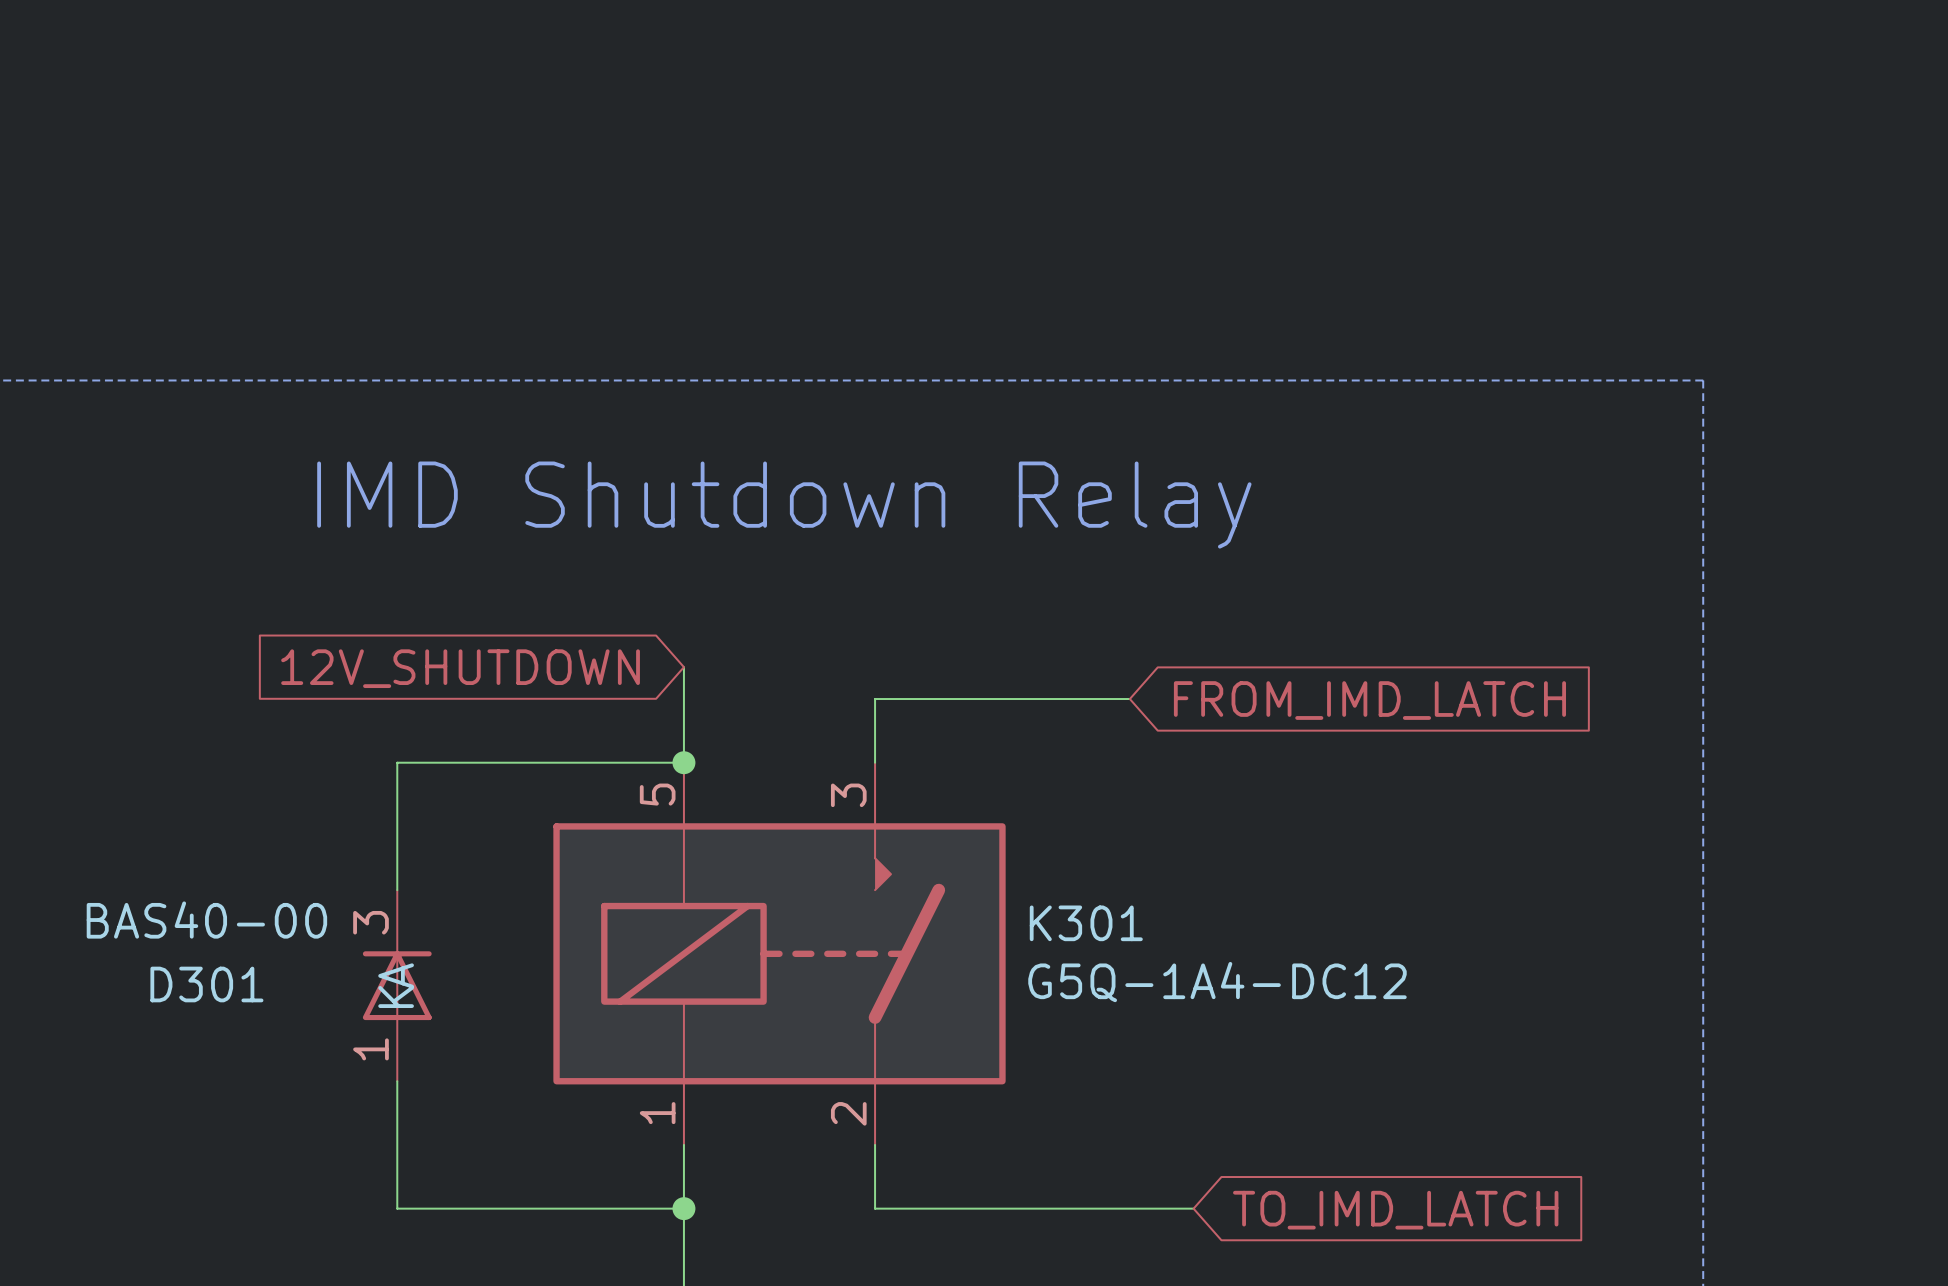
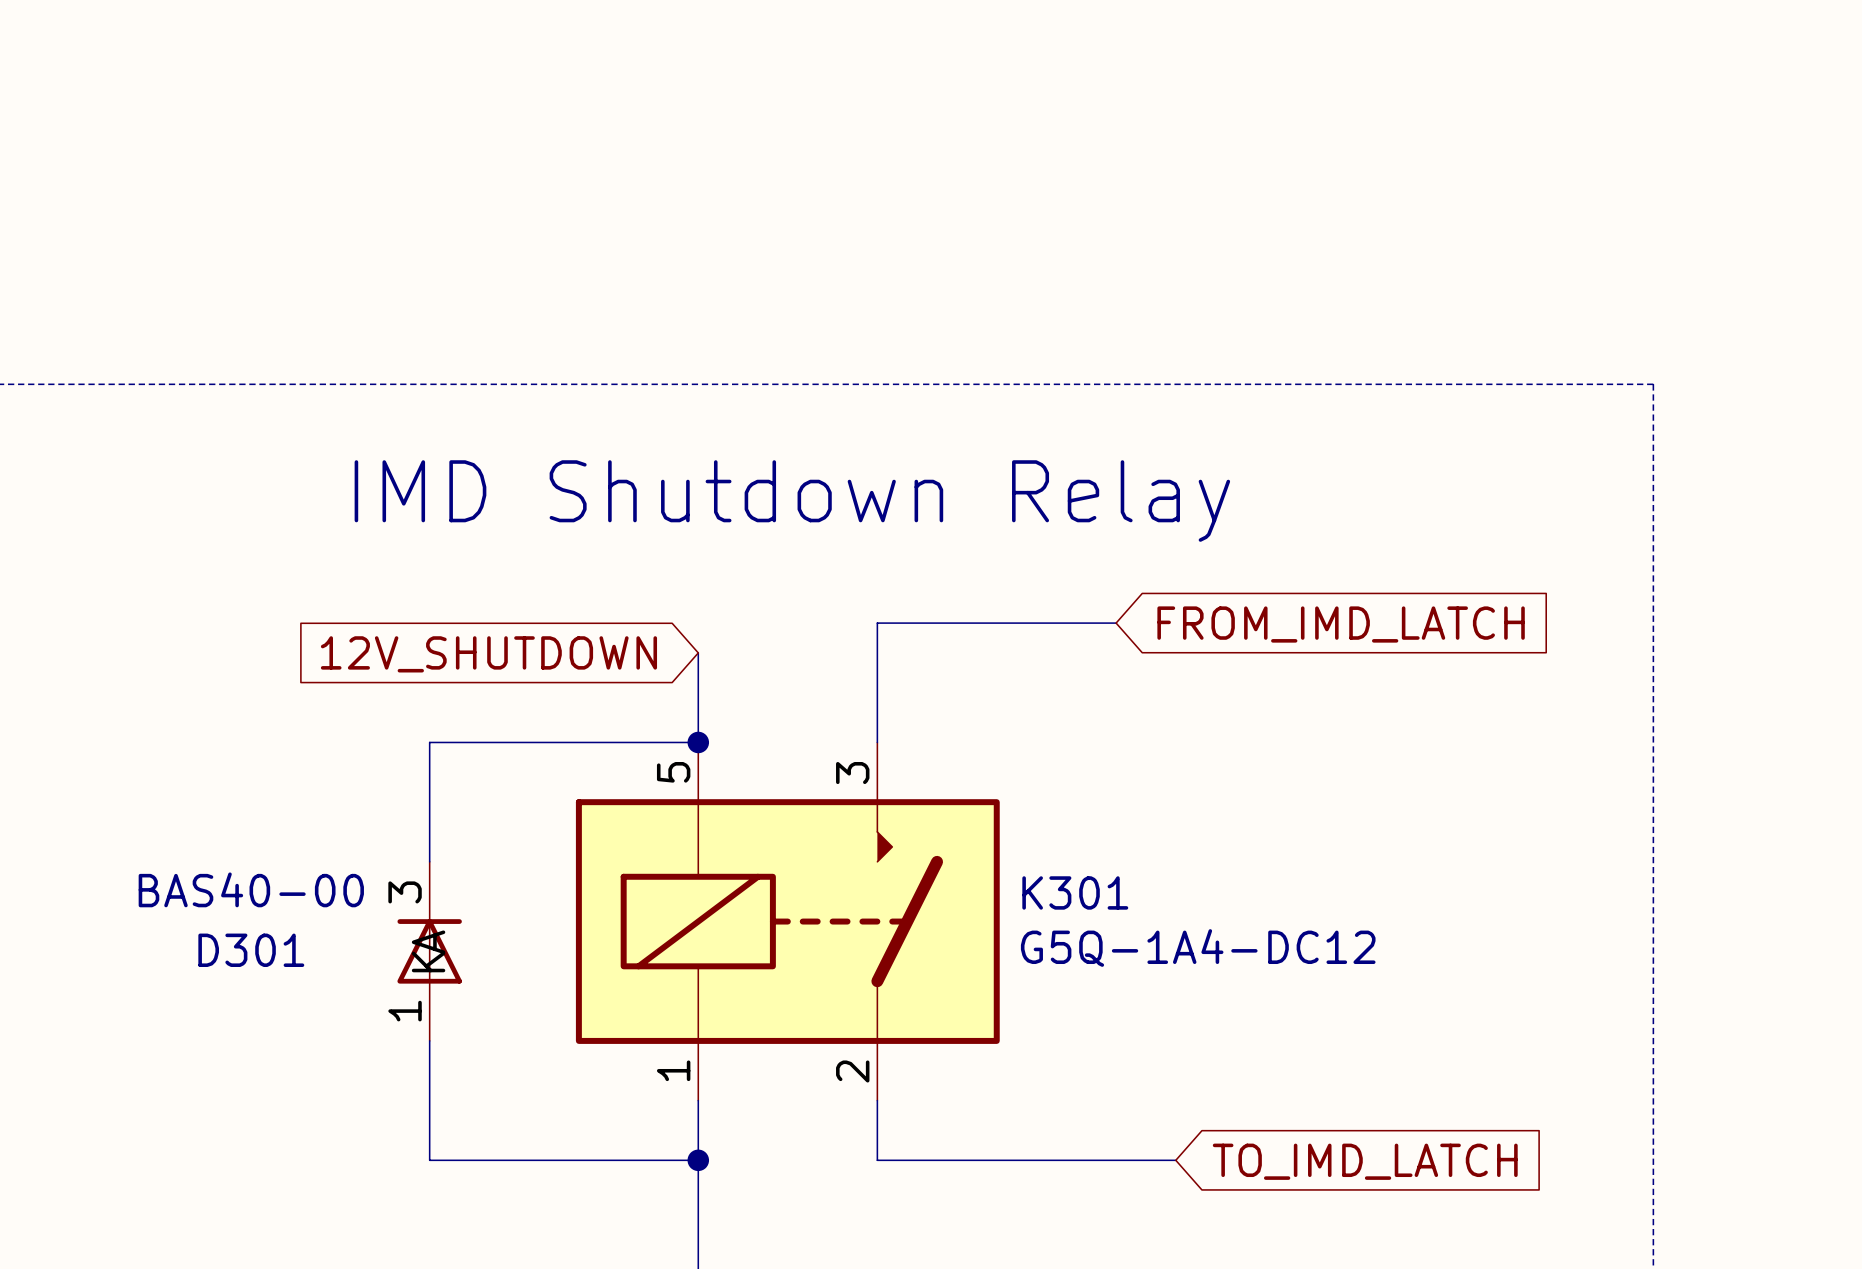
wire: (875, 699) (1129, 699) -> (877, 682) (877, 623) (1116, 623)
global label position: FROM_IMD_LATCH (1369, 700) -> FROM_IMD_LATCH (1341, 624)

